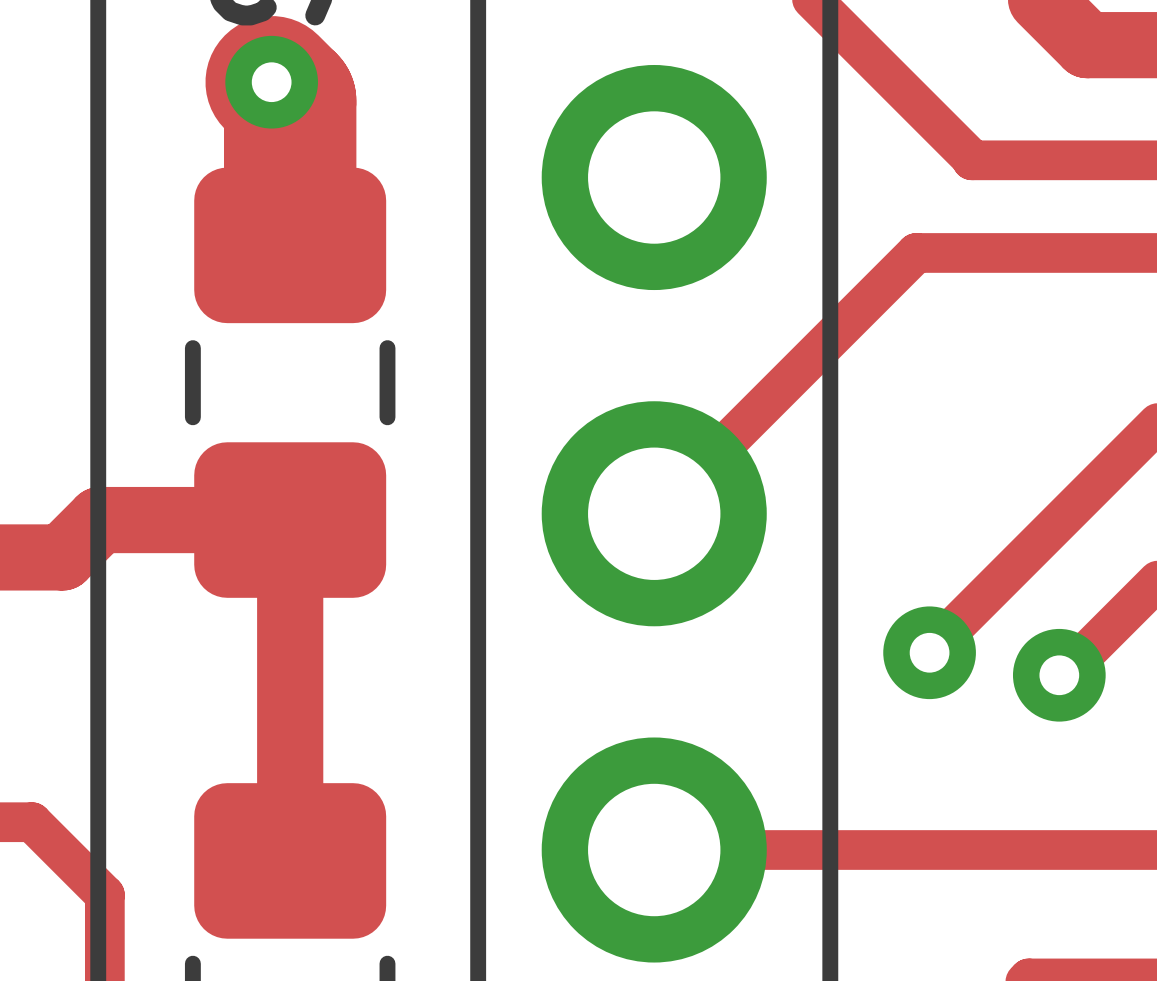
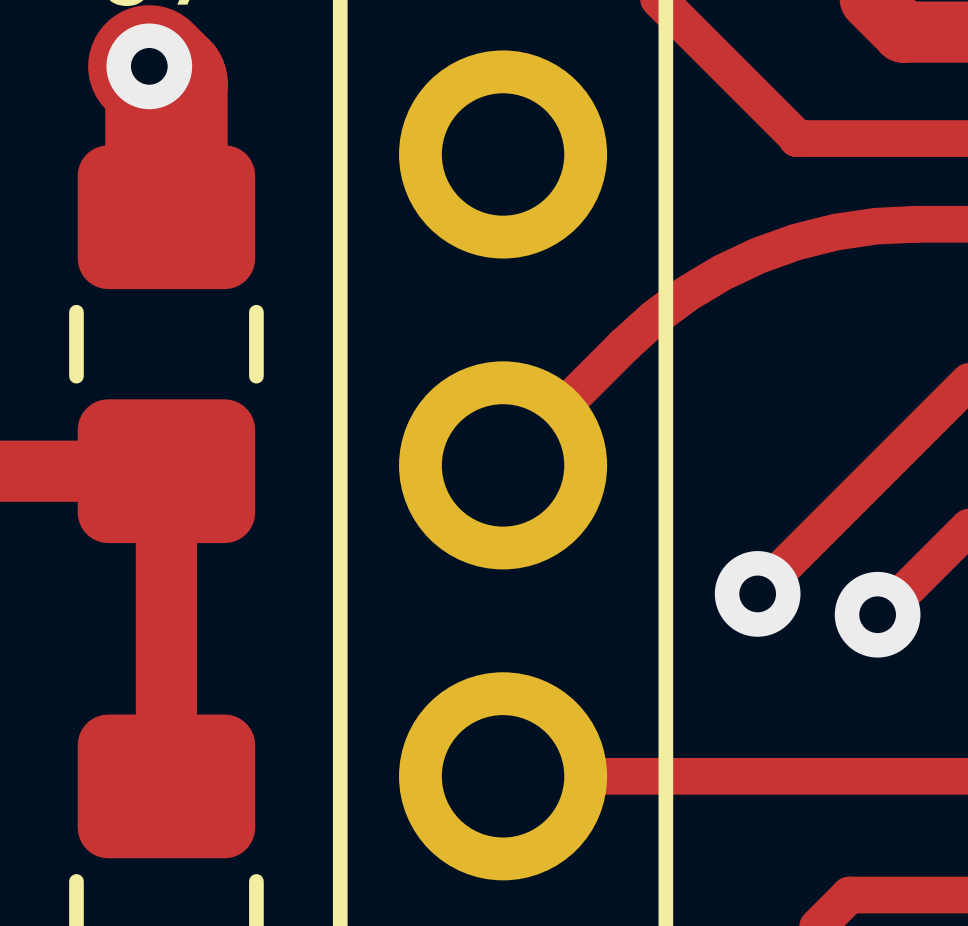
track: (1100, 252) (916, 252) (785, 383) -> (915, 224) (875, 226) (835, 232) (796, 241) (758, 255) (721, 272) (687, 293) (654, 317) (624, 344)

